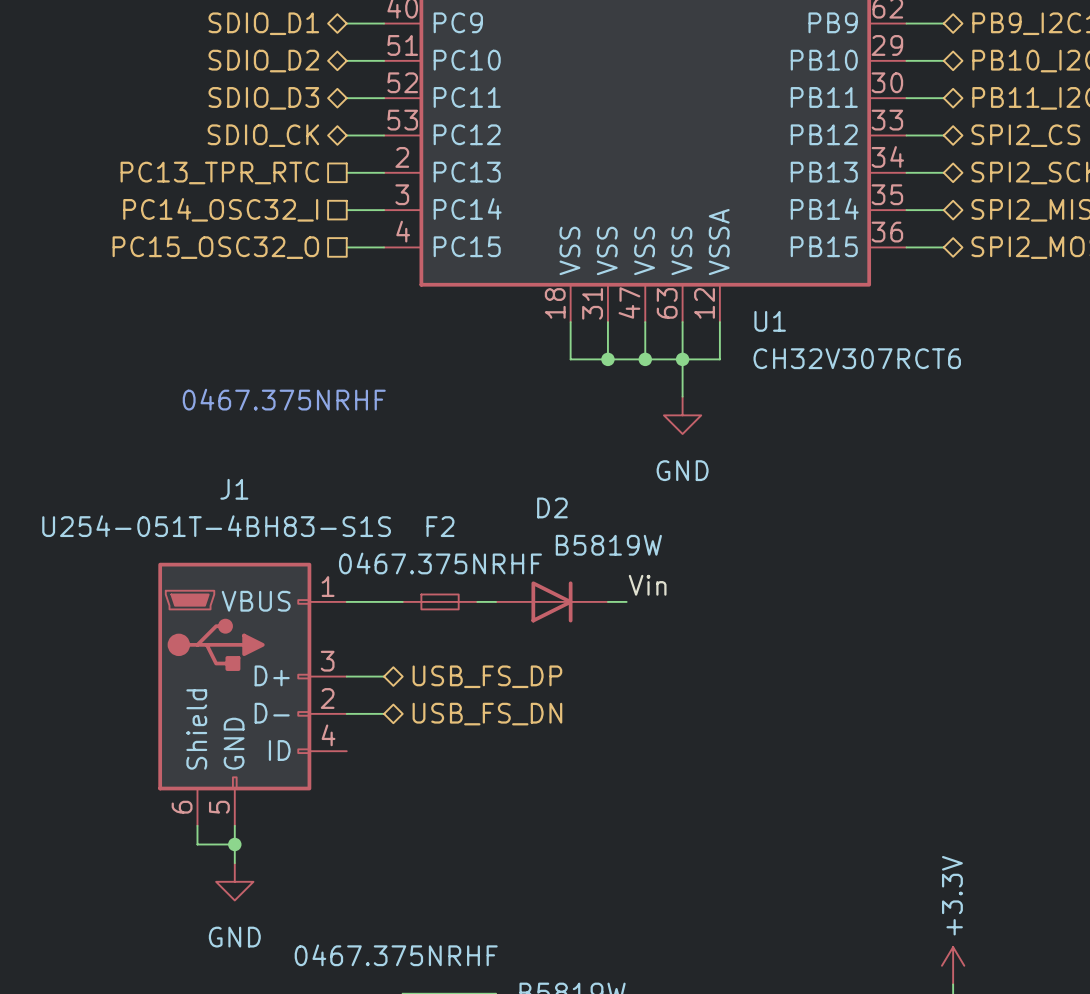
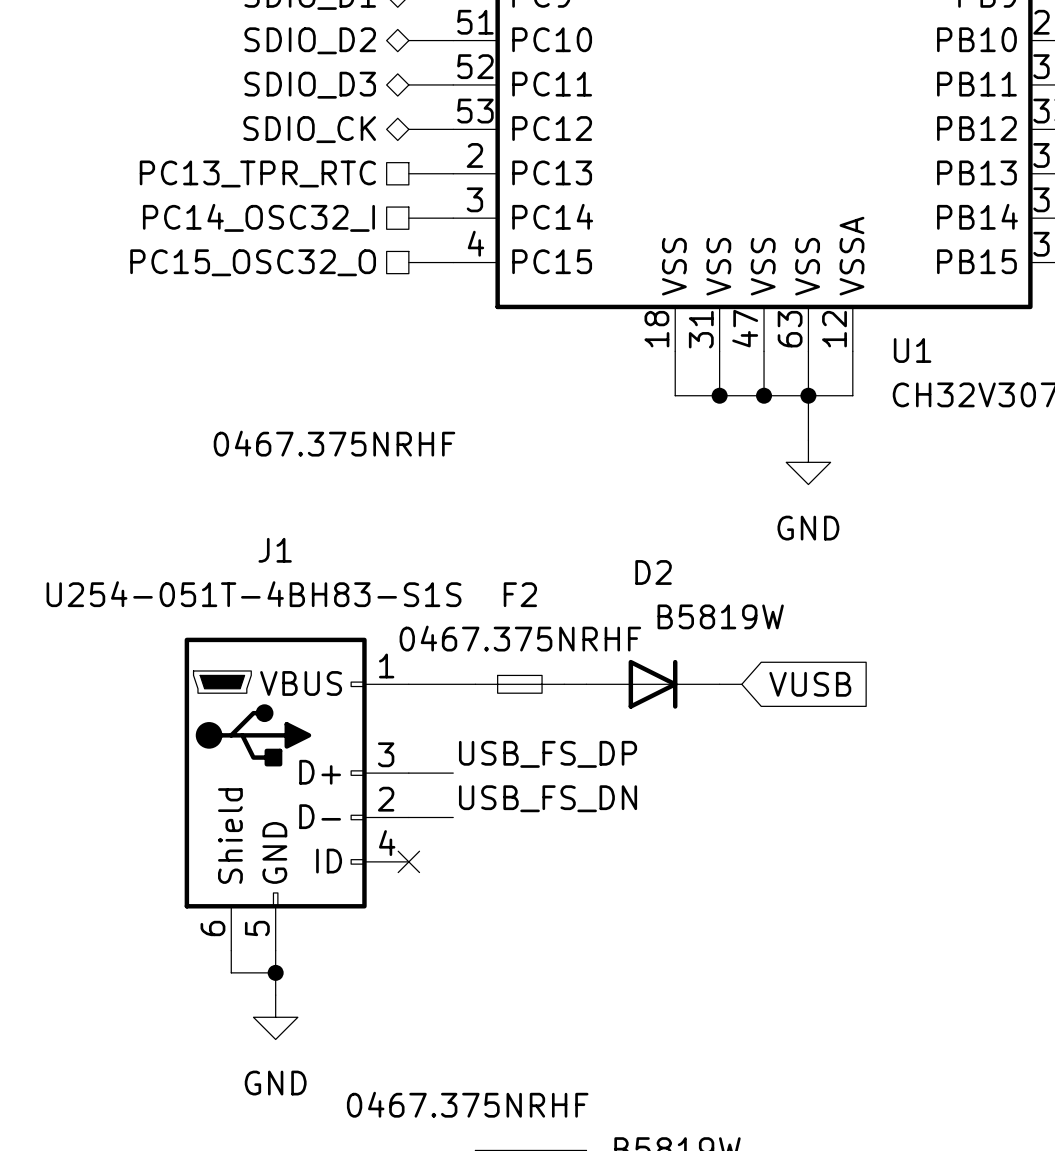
label: Vin (647, 585) -> none
global label: none -> VUSB (810, 684)
label: none -> USB_FS_DP (548, 754)
hierarchical label: USB_FS_DP (487, 676) -> none
label: none -> USB_FS_DN (548, 798)
hierarchical label: USB_FS_DN (487, 714) -> none
no-connect mark: none -> (408, 861)

